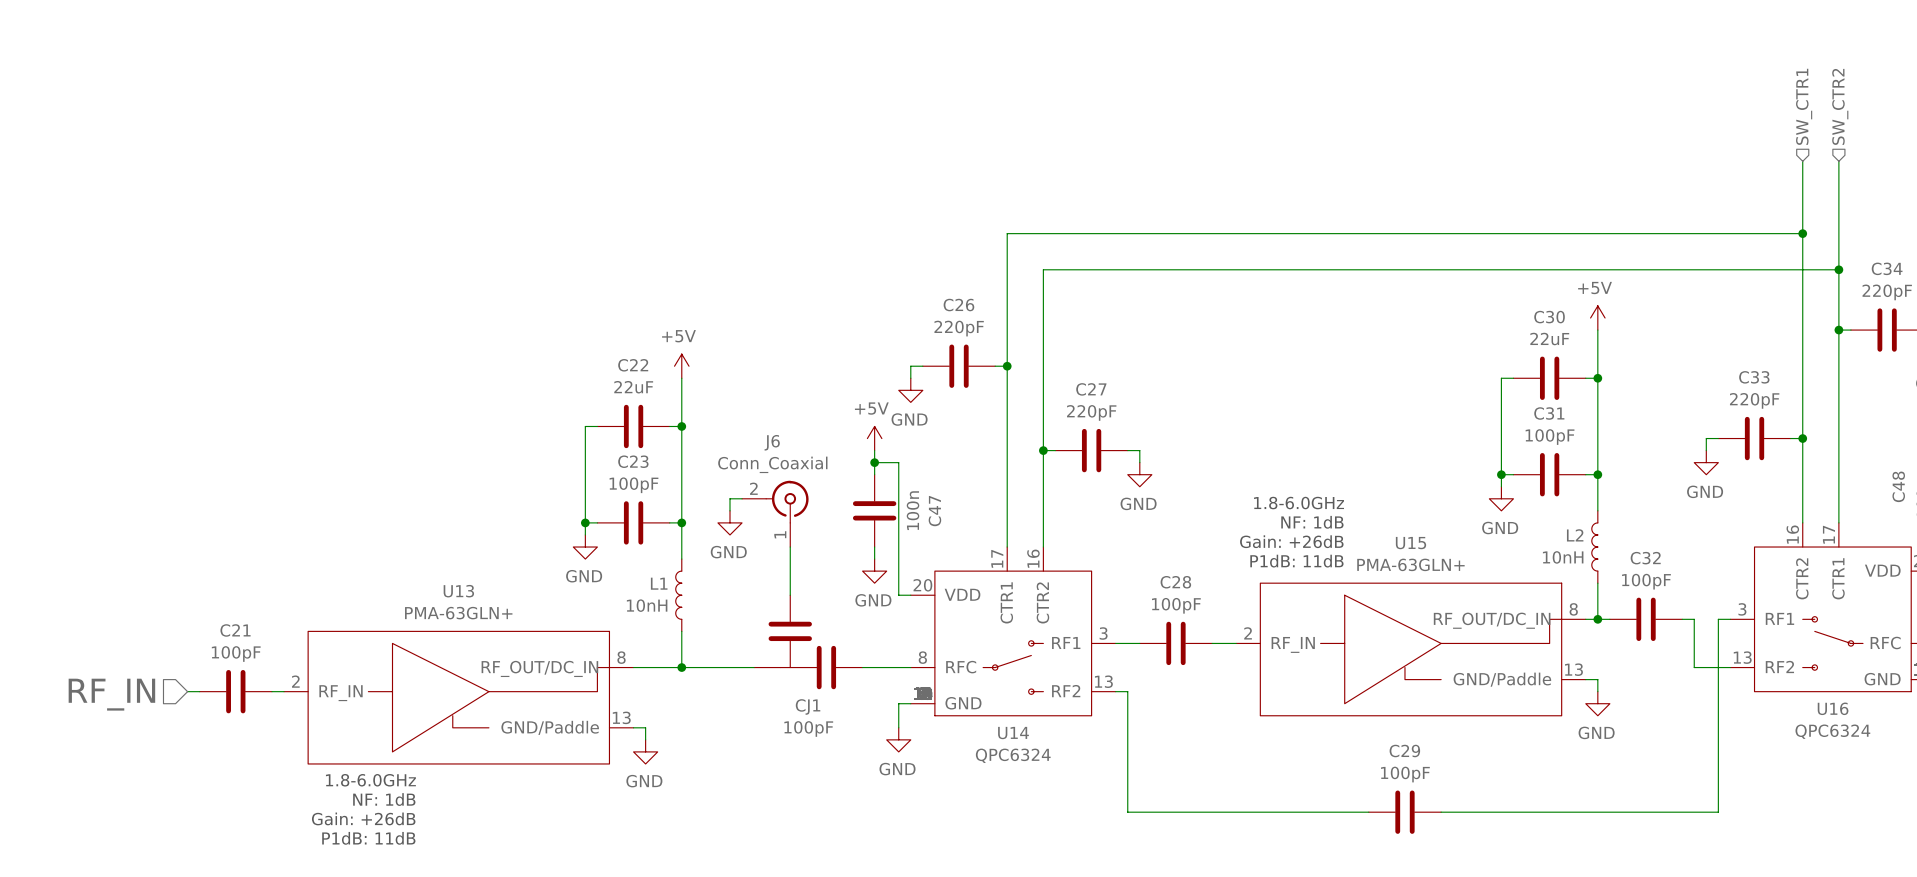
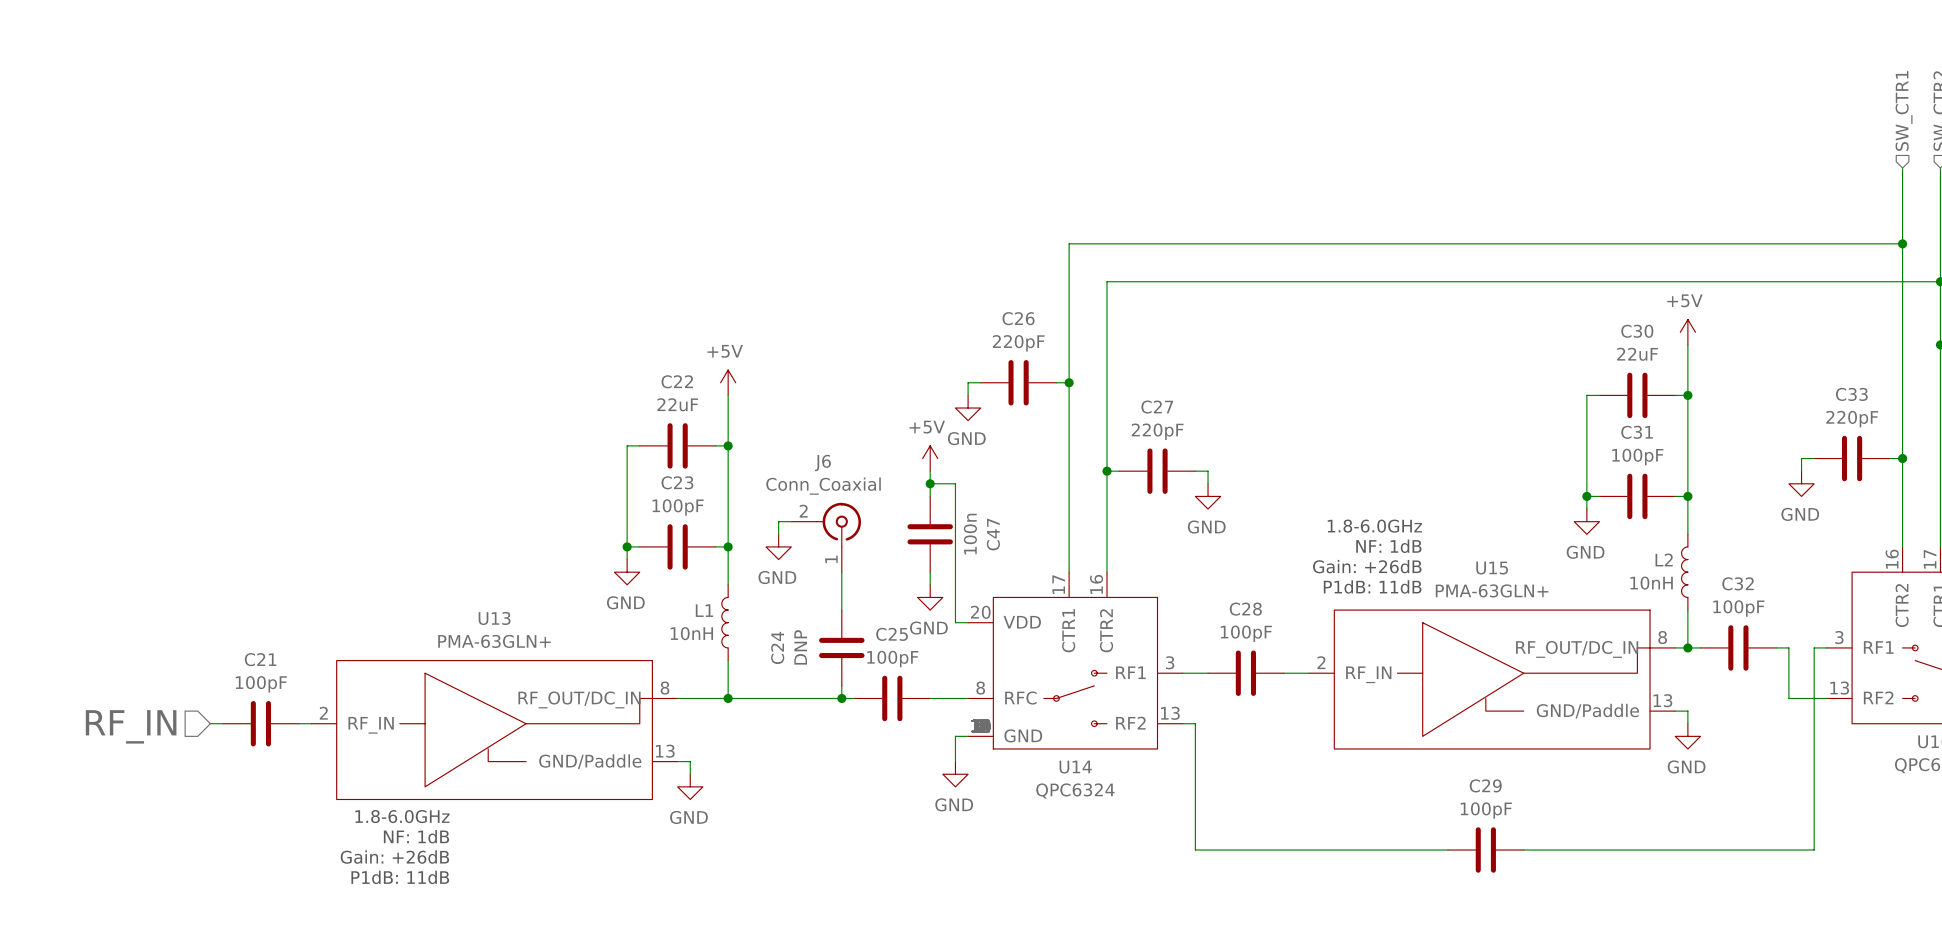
C24: none -> DNP (841, 647)
CJ1: 100pF (808, 642) -> none
junction: none -> (841, 698)
C25: none -> 100pF (892, 698)

